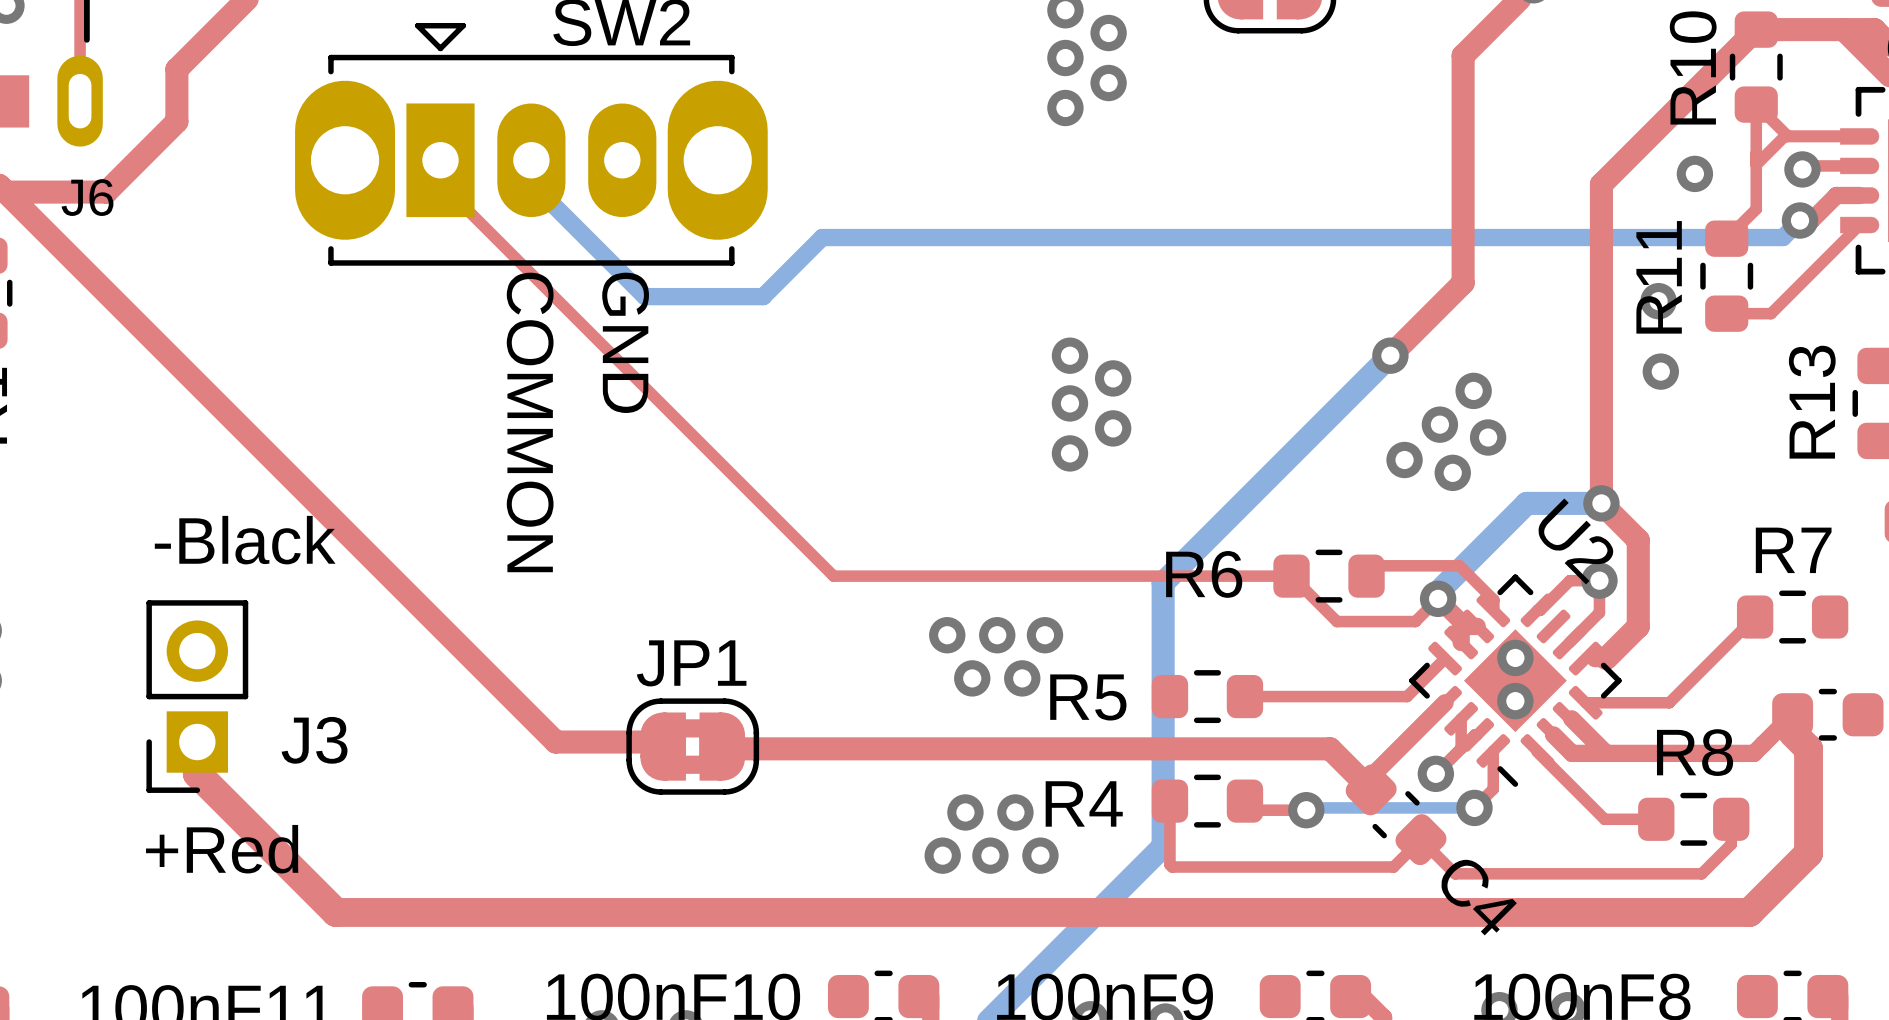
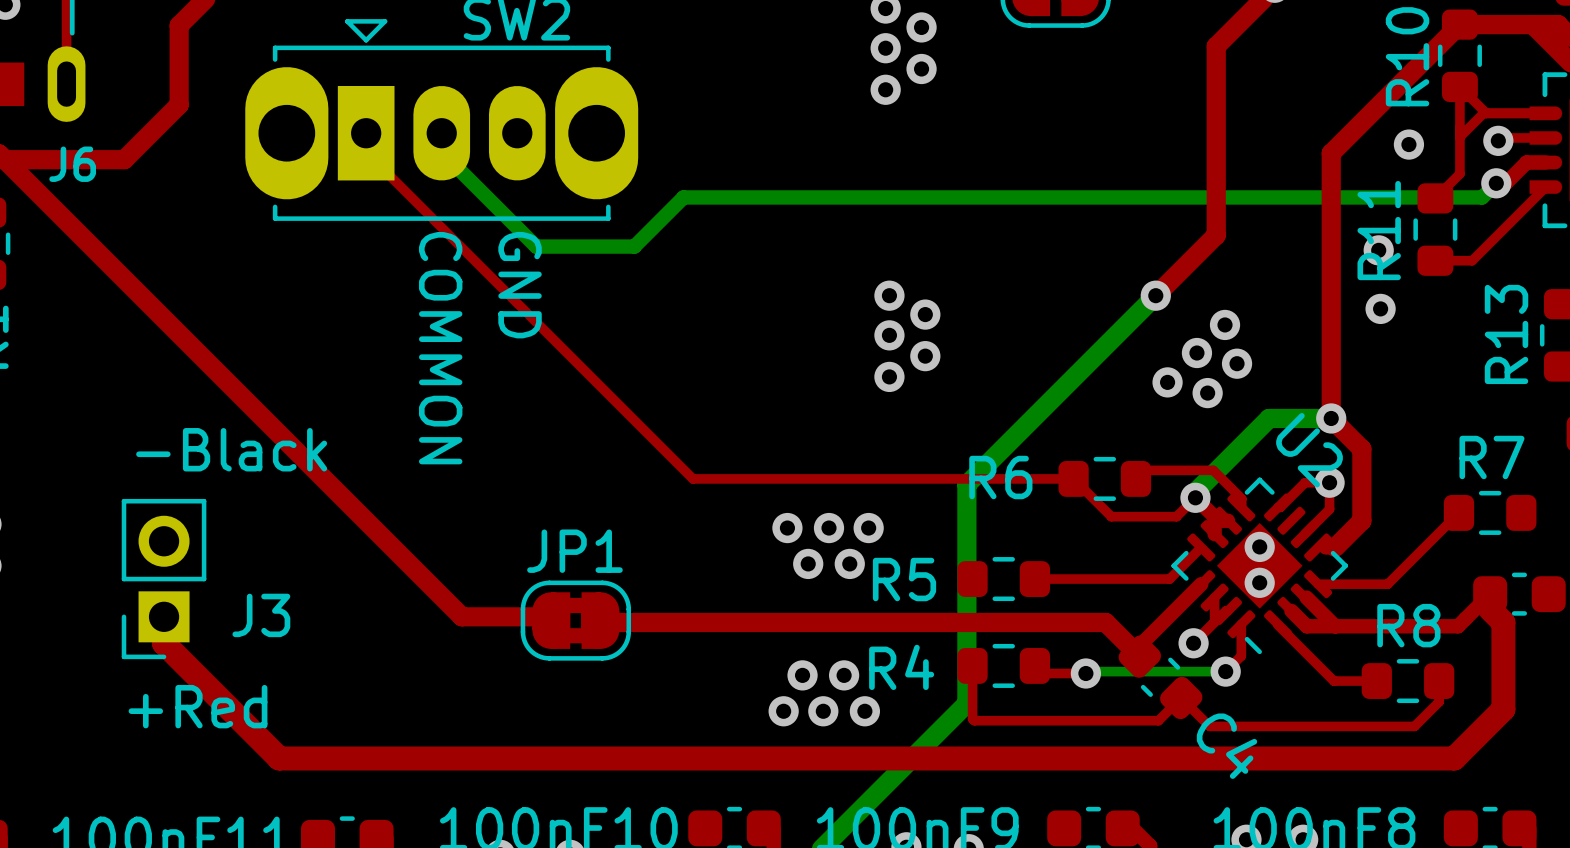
top track: (215, 30) (176, 69) (176, 121) (106, 192) -> (179, 25) (179, 104) (124, 159) (88, 159)

